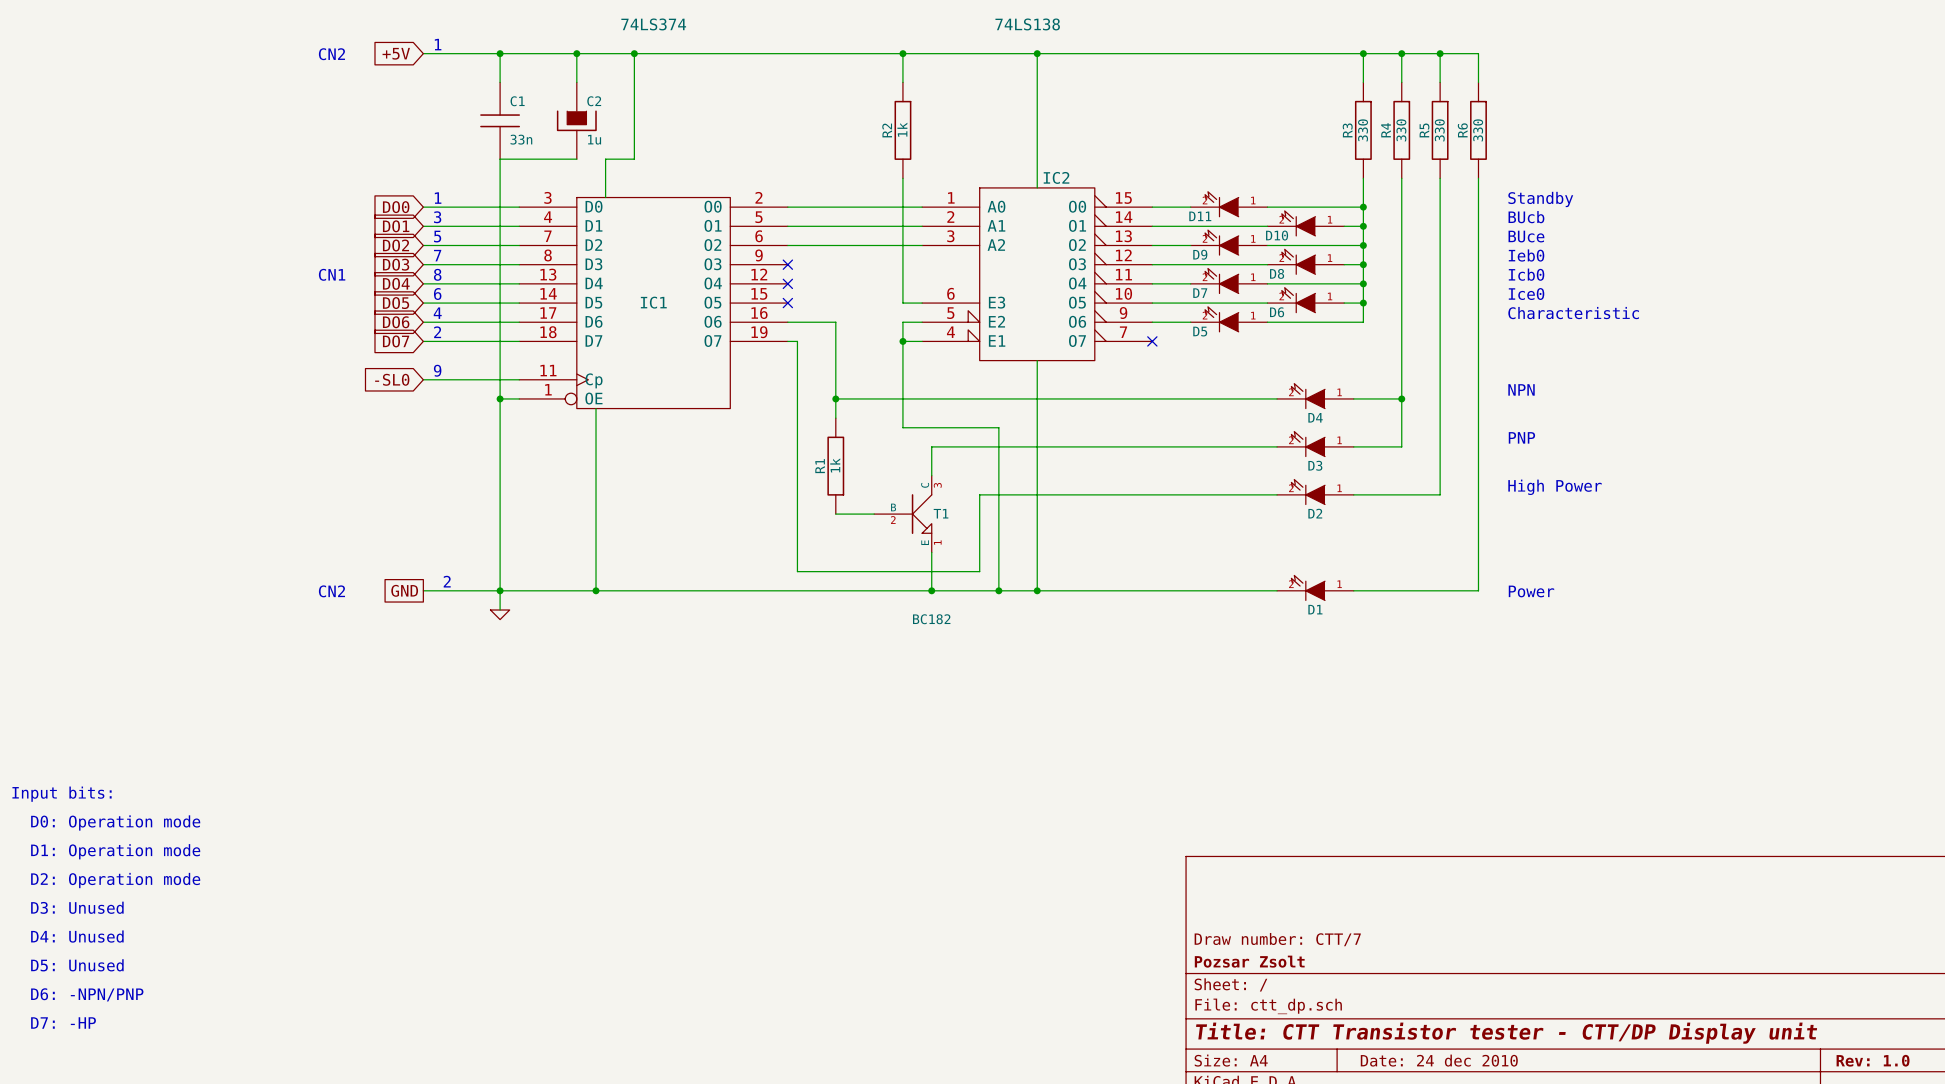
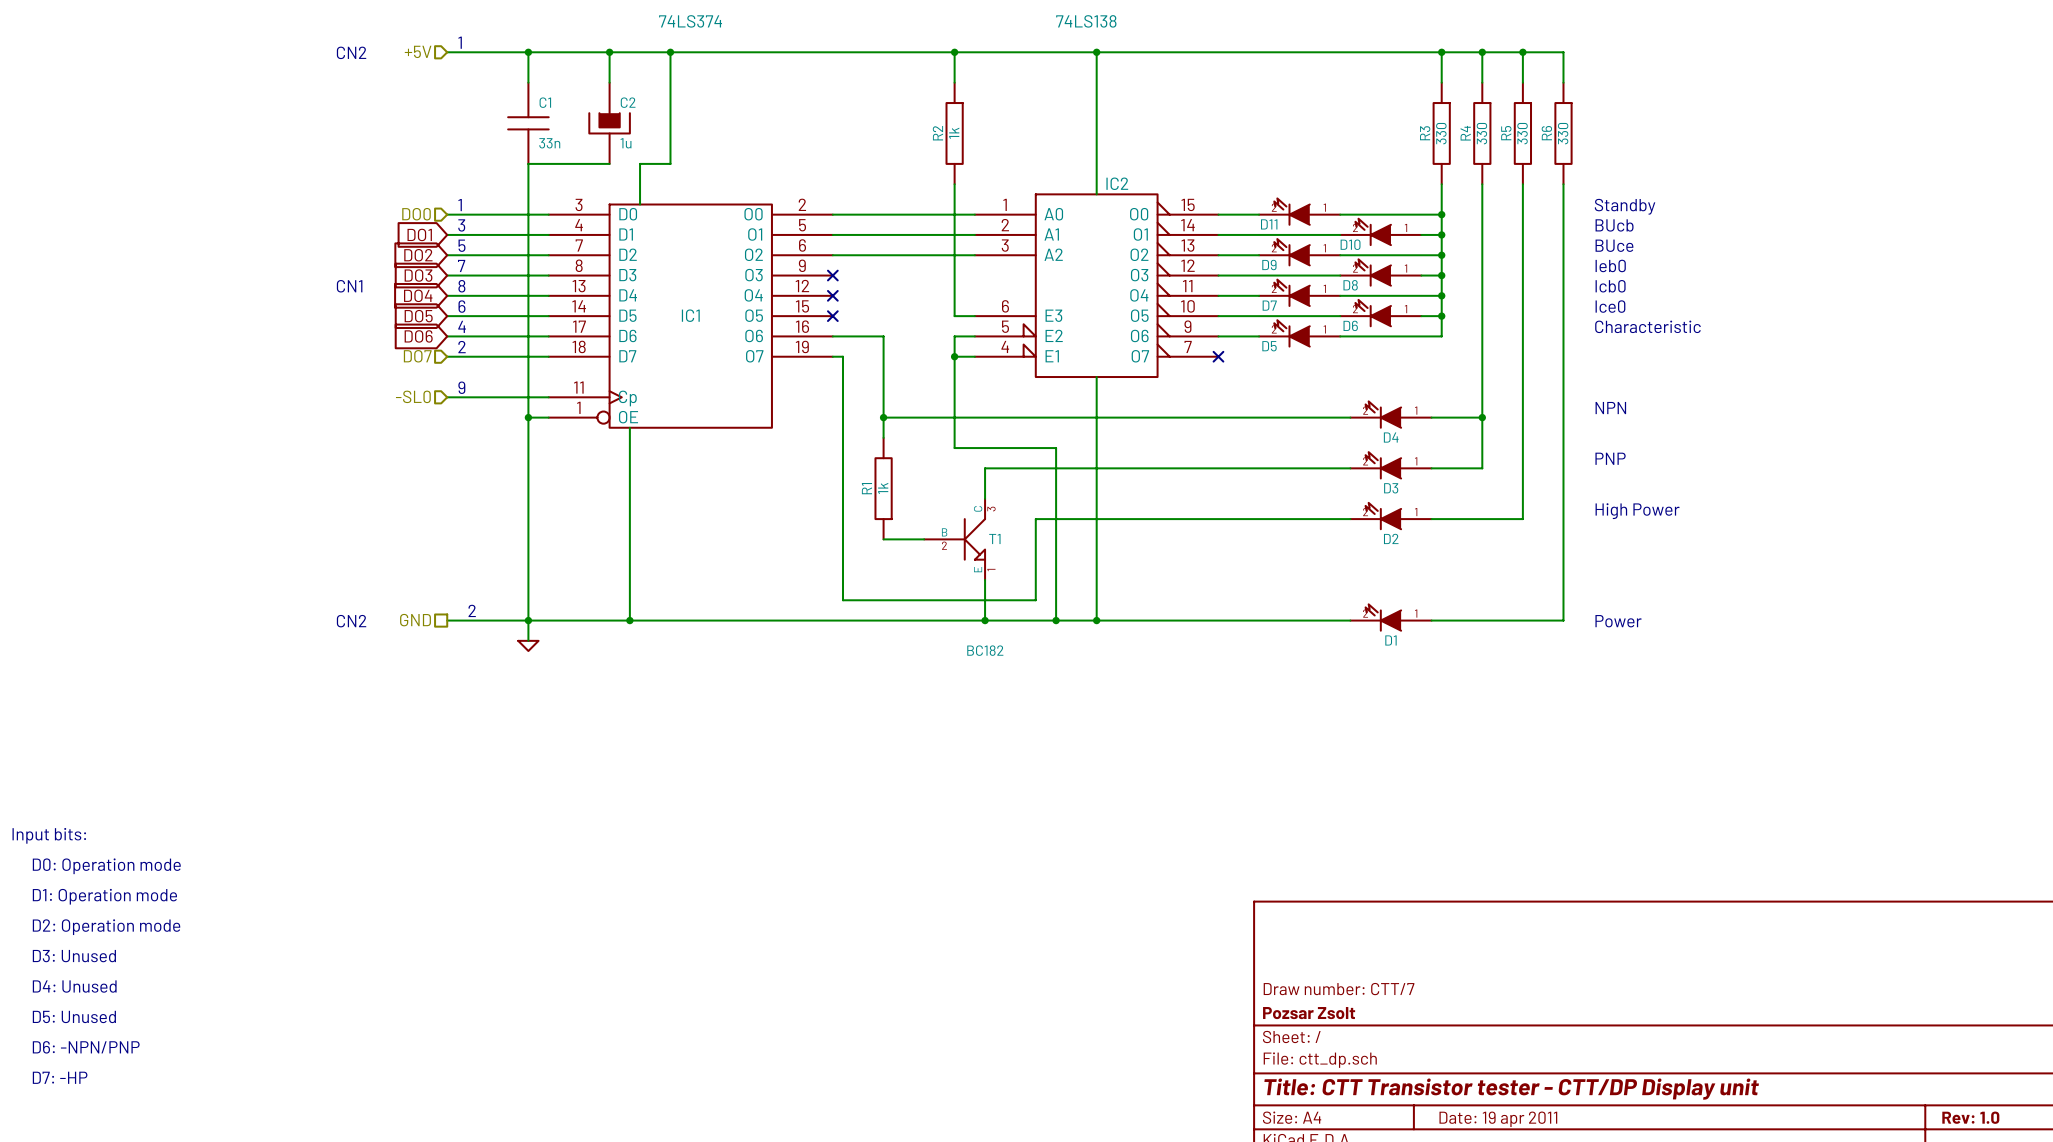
hierarchical label: none -> +5V (418, 51)
global label: +5V (396, 53) -> none
hierarchical label: none -> DO0 (416, 214)
global label: DO0 (396, 207) -> none
hierarchical label: none -> DO7 (417, 356)
global label: DO7 (396, 341) -> none
hierarchical label: none -> -SL0 (413, 396)
global label: -SL0 (392, 379) -> none
hierarchical label: none -> GND (415, 620)
global label: GND (404, 590) -> none
title block: Date: 24 dec 2010 (1439, 1060) -> Date: 19 apr 2011 (1498, 1119)

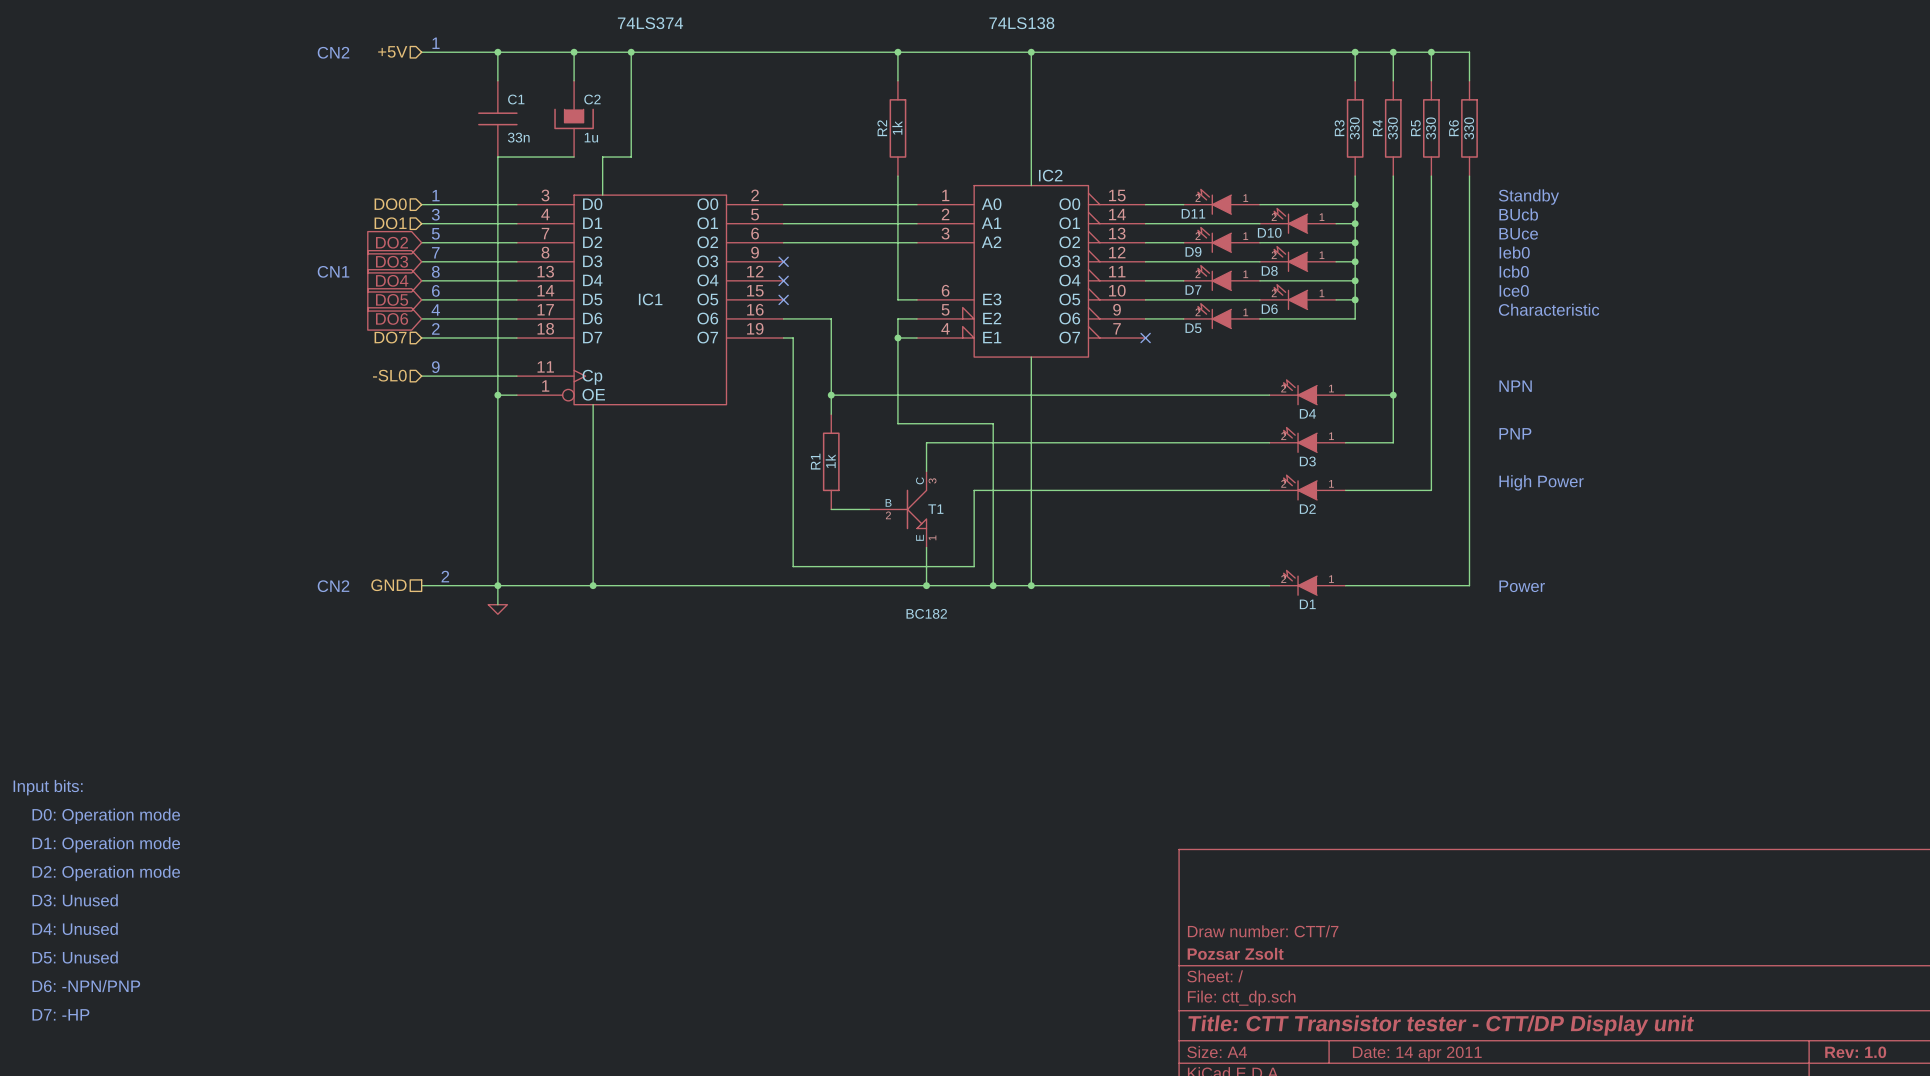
hierarchical label: none -> DO1 (390, 223)
global label: DO1 (419, 234) -> none
title block: Date: 19 apr 2011 (1498, 1119) -> Date: 14 apr 2011 (1417, 1053)

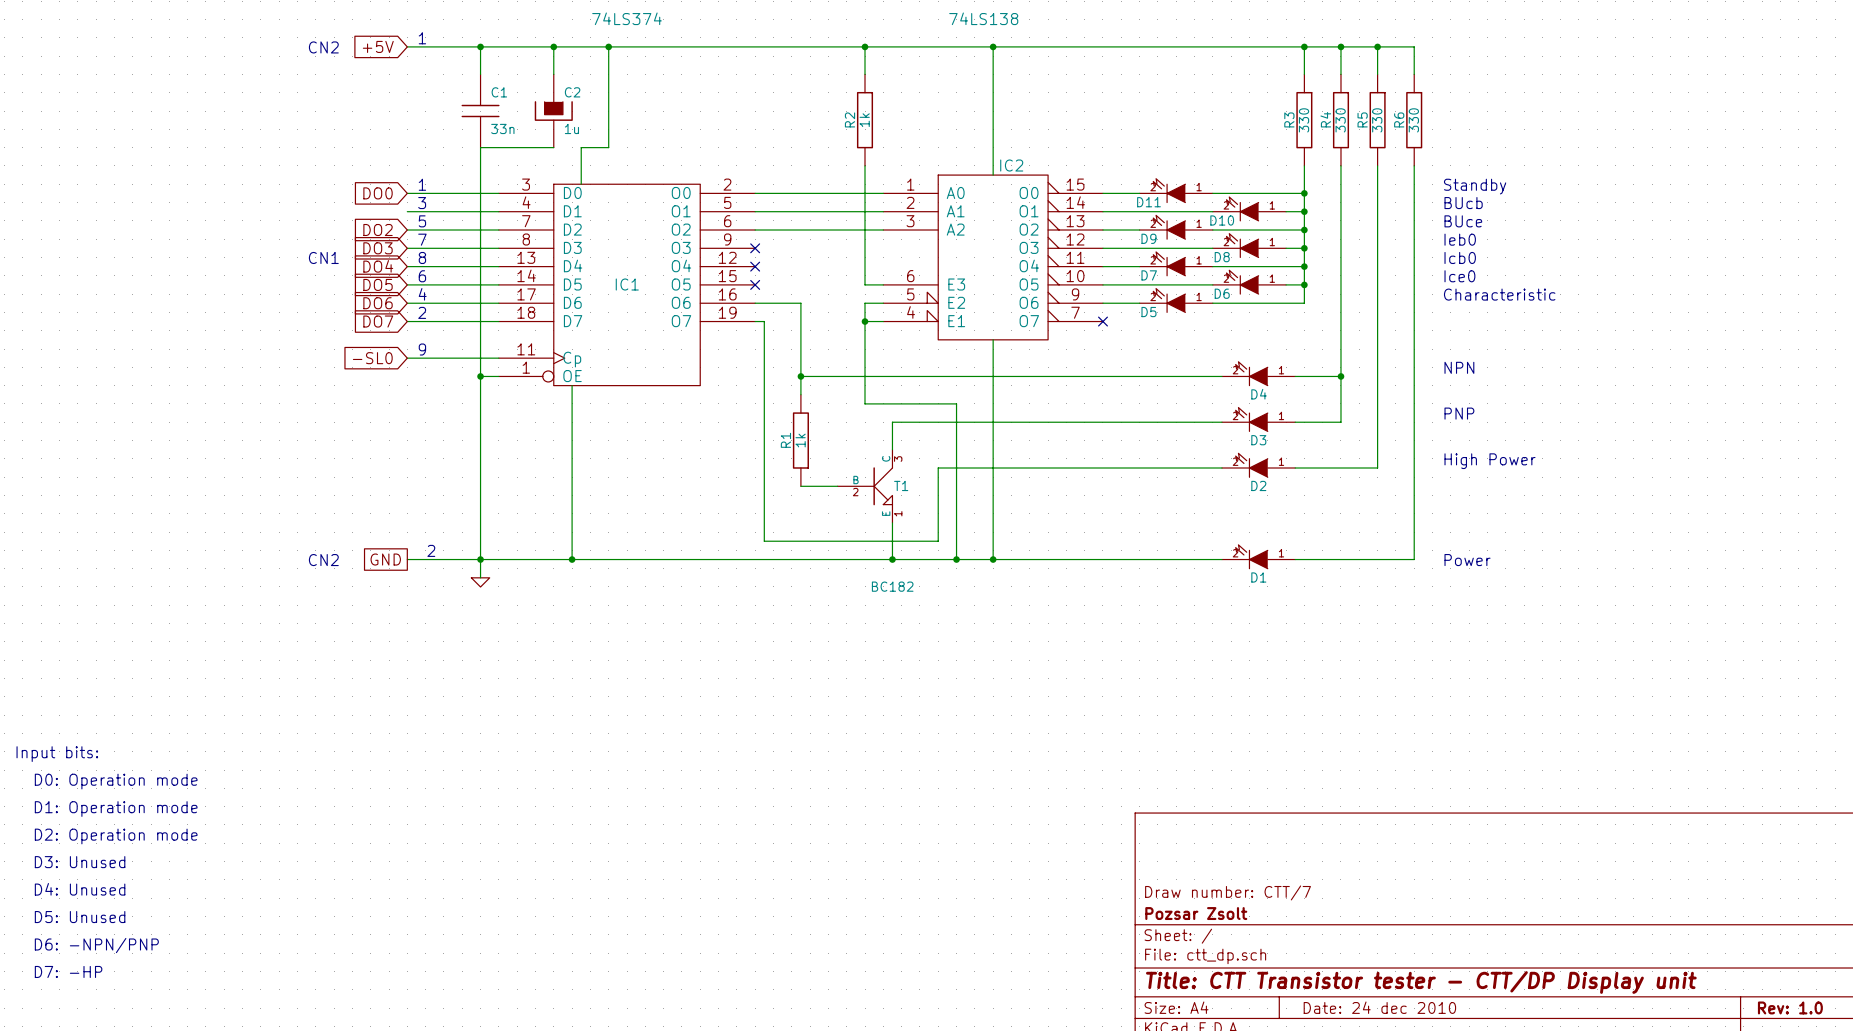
hierarchical label: +5V (392, 51) -> none
global label: none -> +5V (378, 46)
hierarchical label: DO0 (390, 204) -> none
global label: none -> DO0 (378, 193)
hierarchical label: DO1 (390, 223) -> none
hierarchical label: DO7 (390, 337) -> none
global label: none -> DO7 (378, 321)
hierarchical label: -SL0 (389, 375) -> none
global label: none -> -SL0 (372, 358)
hierarchical label: GND (388, 585) -> none
global label: none -> GND (385, 559)
title block: Date: 14 apr 2011 (1417, 1053) -> Date: 24 dec 2010 (1379, 1007)

